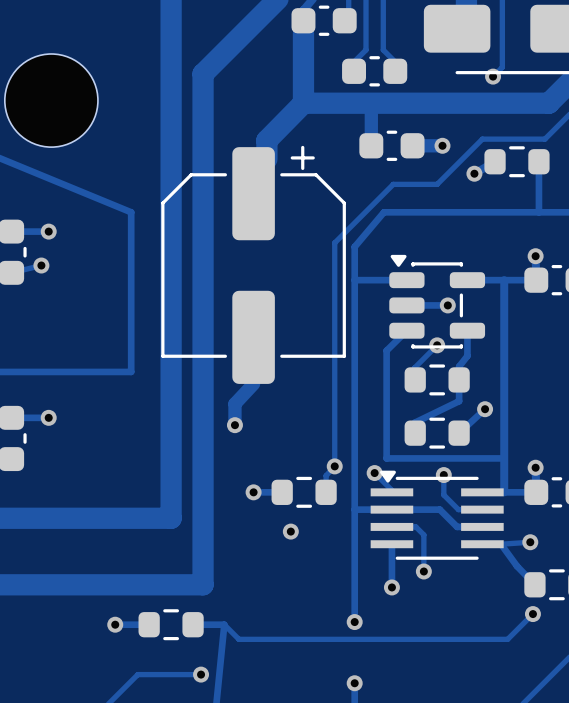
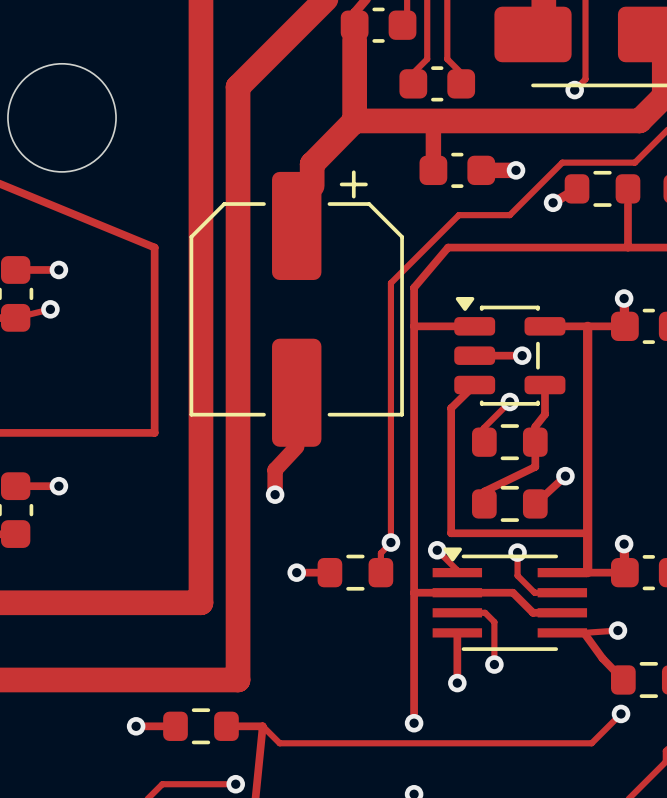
via: (290, 531) -> none

